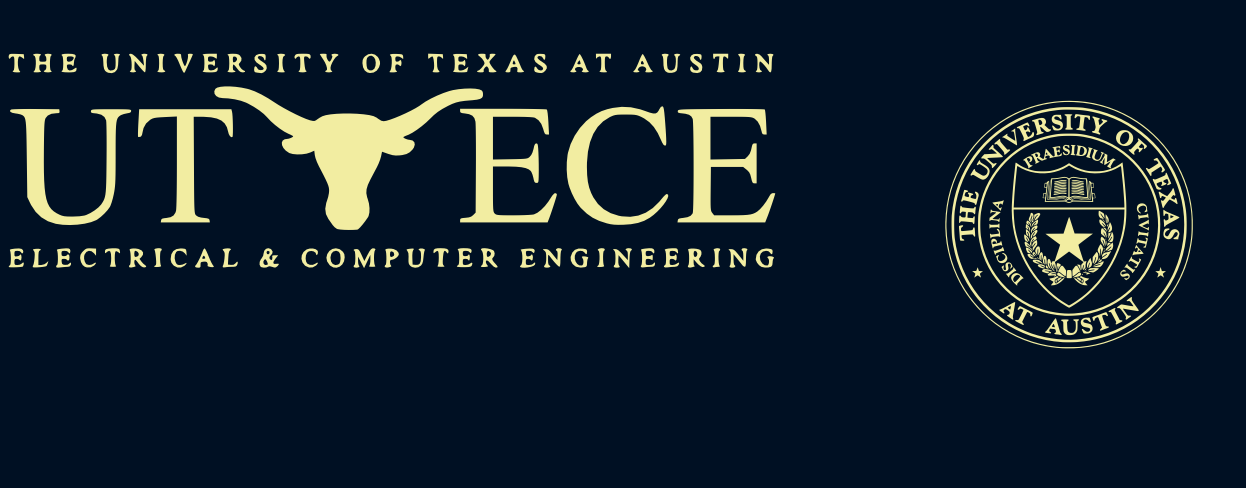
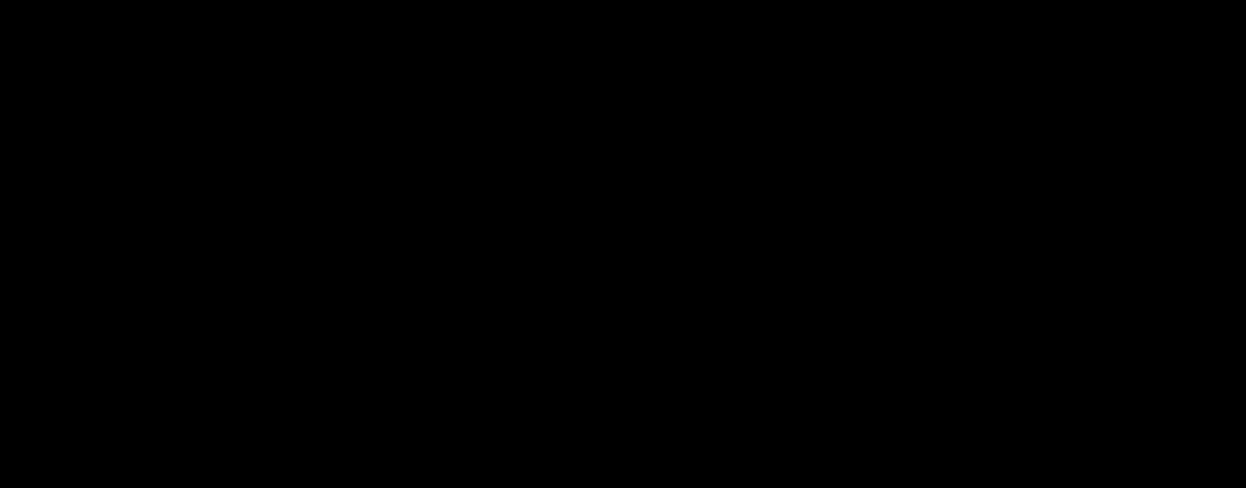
drawing: [8, 53, 776, 269] -> none
drawing: [945, 100, 1193, 349] -> none

